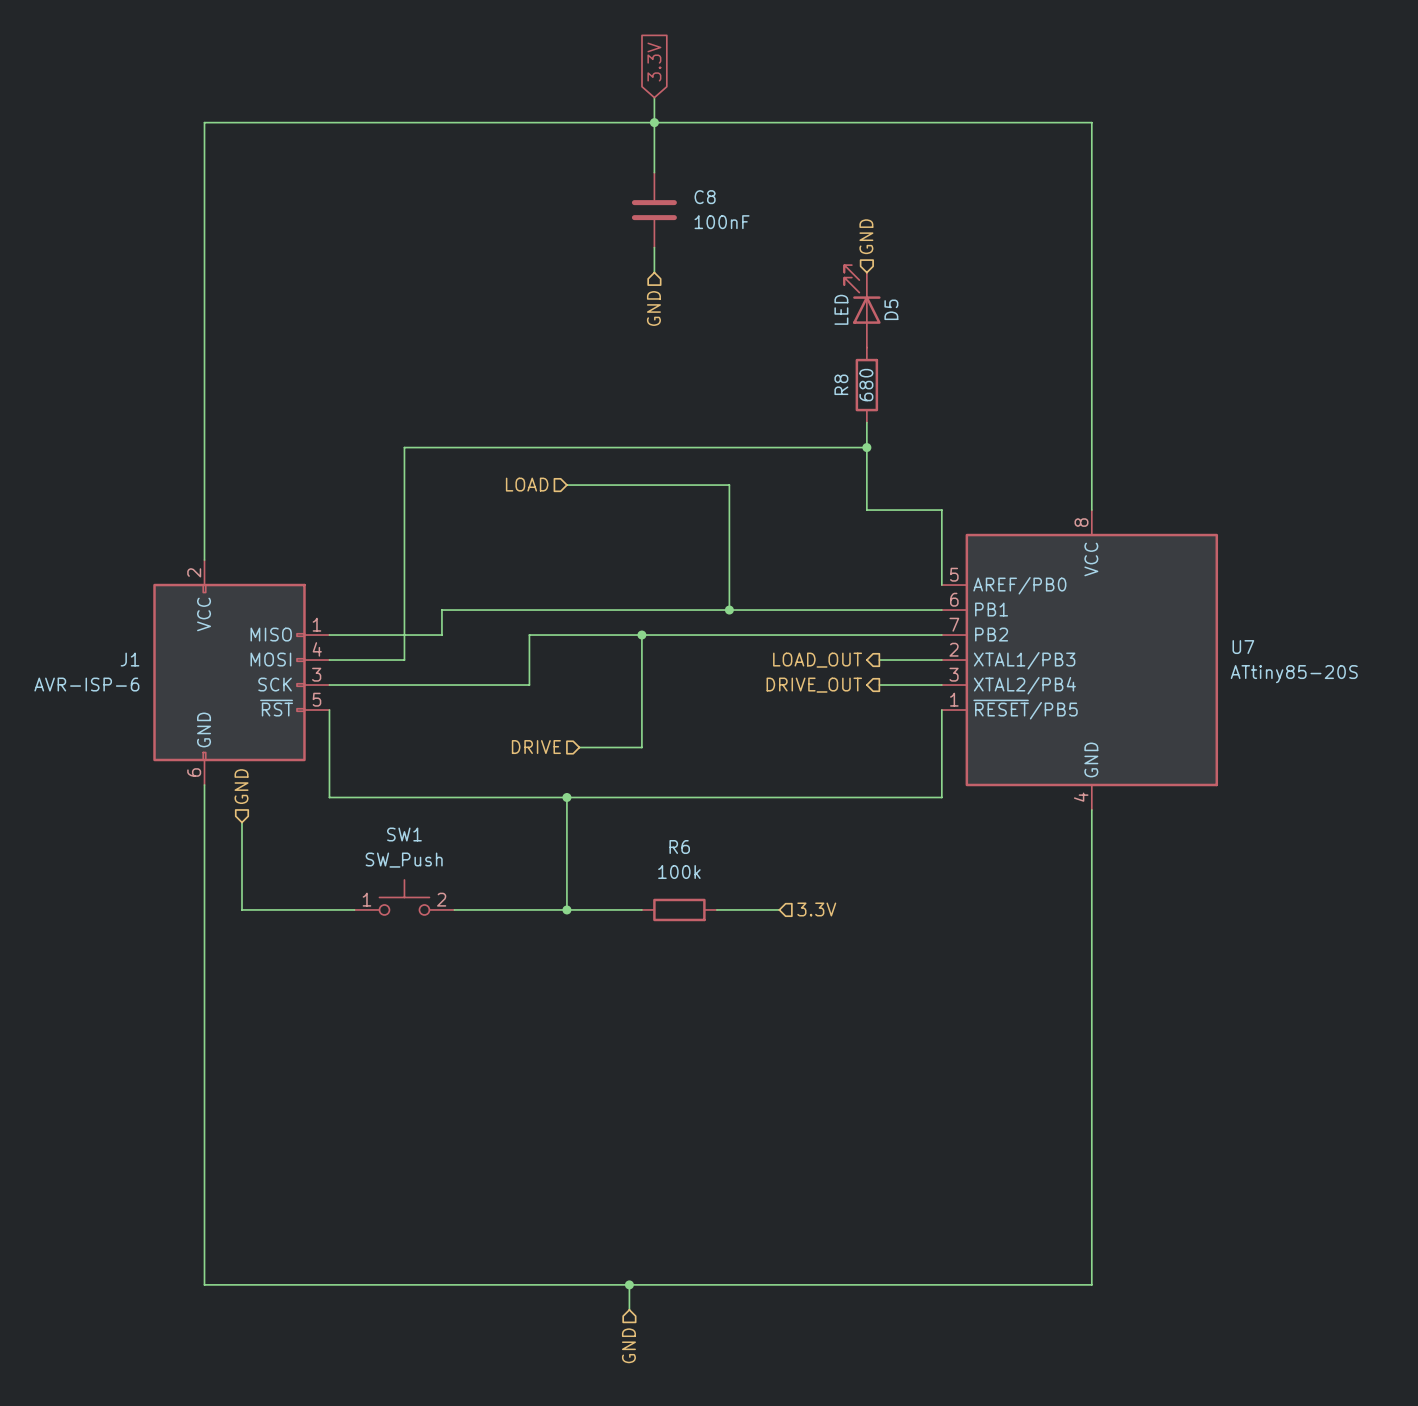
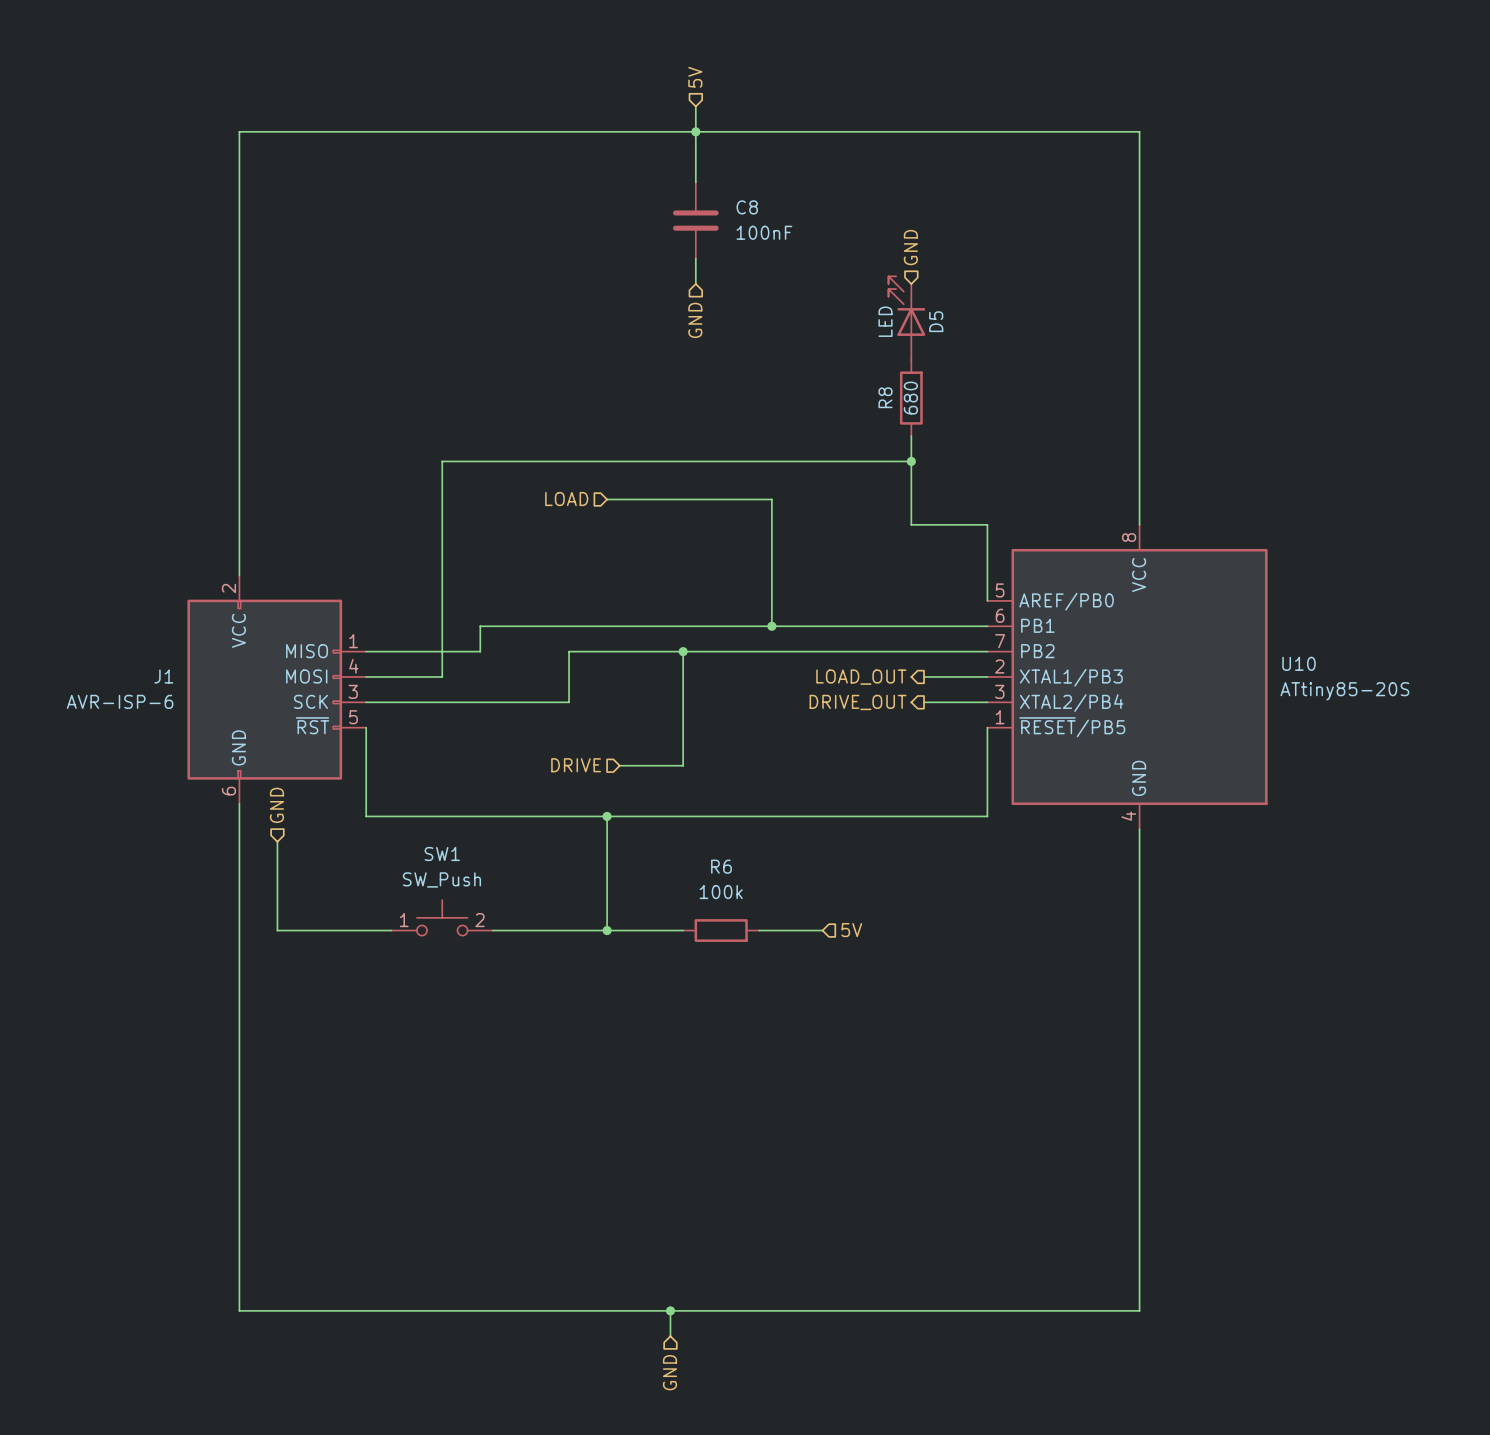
global label: 3.3V (654, 62) -> none
hierarchical label: none -> 5V (695, 77)
U7 name: U7 (1243, 647) -> U10 (1299, 663)
hierarchical label: 3.3V (816, 909) -> 5V (851, 930)

